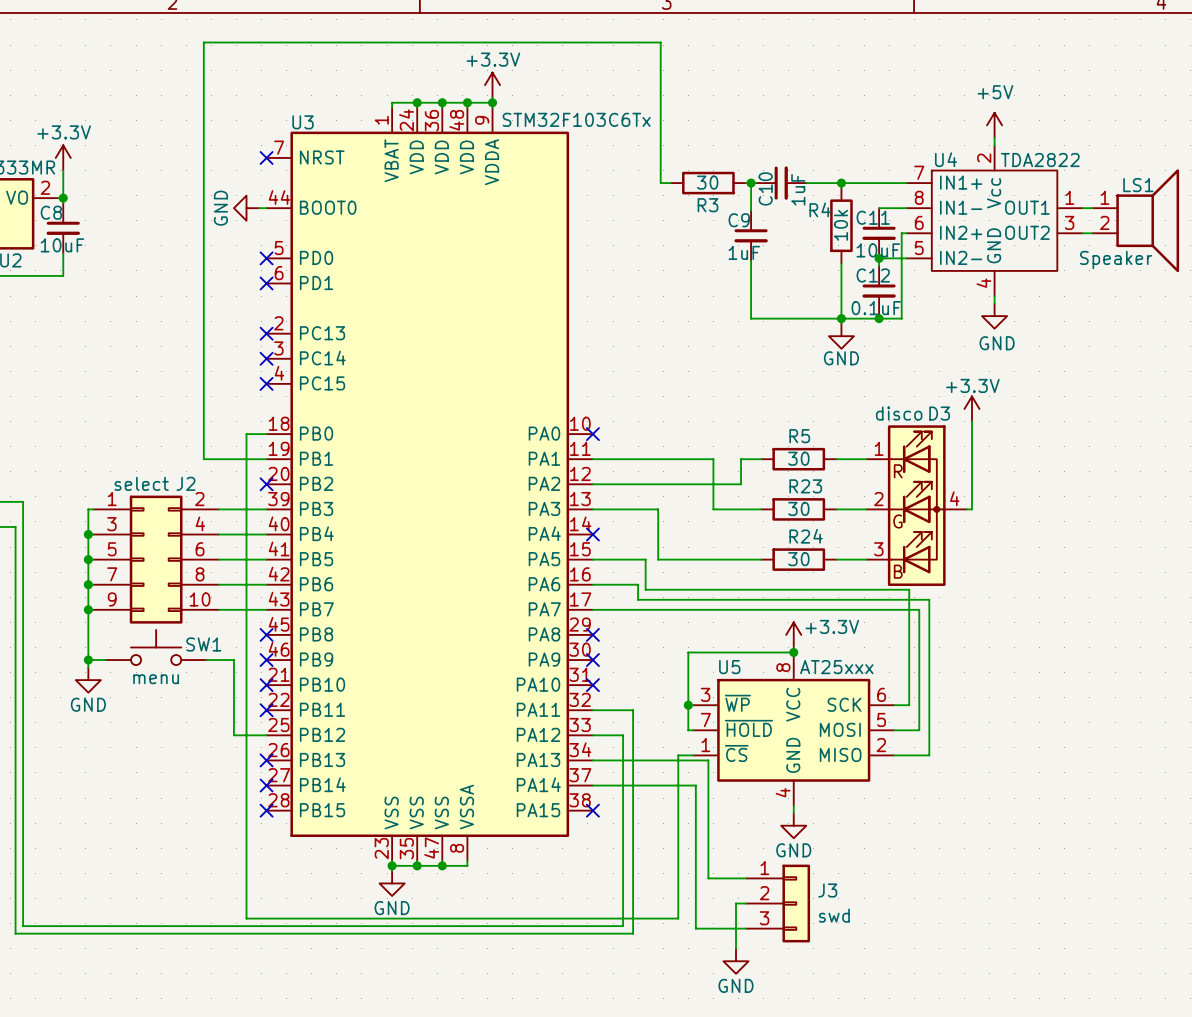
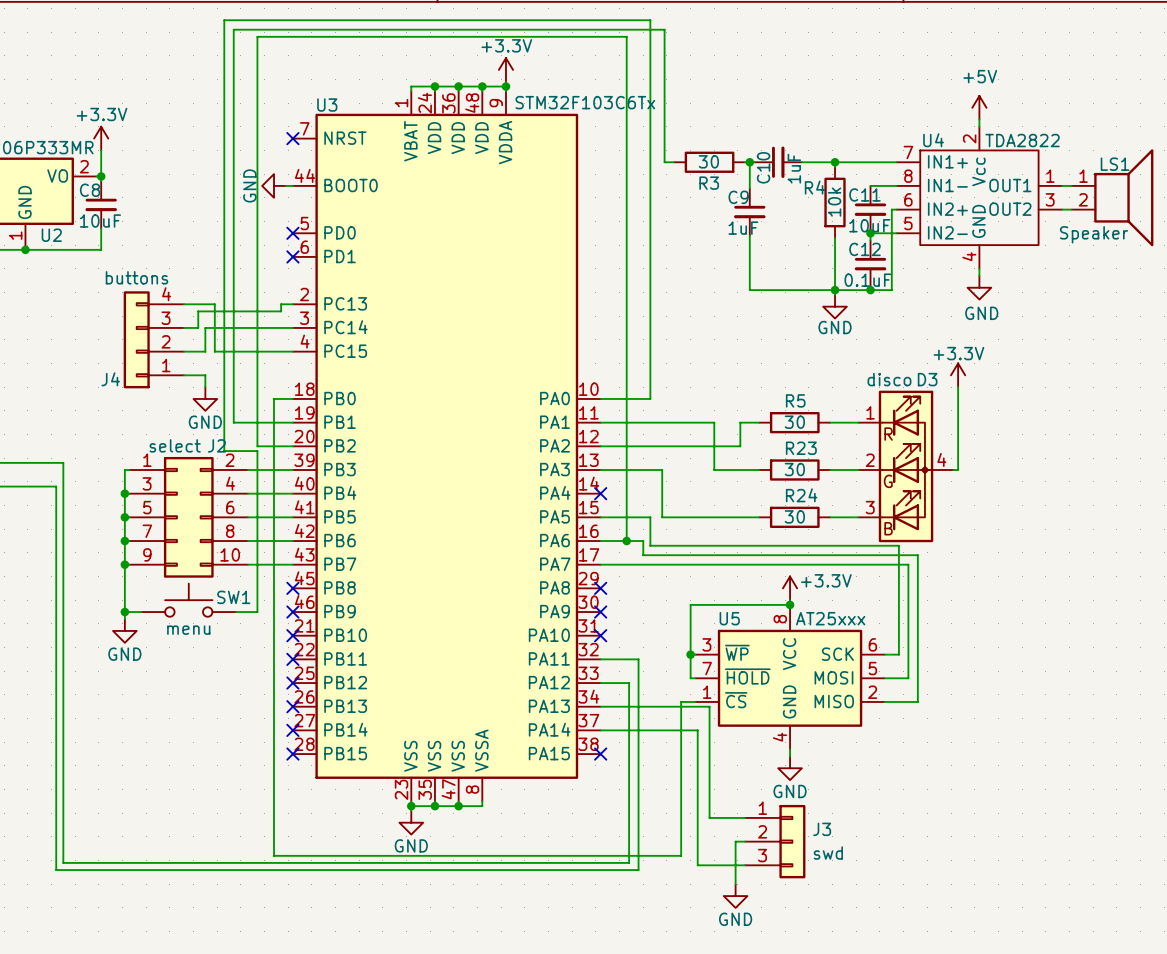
wire: none -> (184, 304) (214, 304) (214, 351) (292, 351)
wire: none -> (292, 304) (281, 304) (281, 311) (198, 311) (198, 327) (184, 327)
no-connect mark: (266, 333) -> none
wire: none -> (292, 327) (205, 327) (205, 351) (184, 351)
no-connect mark: (266, 358) -> none
J4: none -> buttons (153, 339)
no-connect mark: (266, 383) -> none
wire: none -> (184, 375) (205, 375) (205, 387)
power symbol: none -> GND (205, 398)
no-connect mark: (592, 434) -> none
wire: none -> (292, 446) (257, 446) (257, 36) (626, 36) (626, 541)
no-connect mark: (266, 484) -> none
junction: none -> (626, 541)
wire: (228, 660) (233, 660) (233, 735) (266, 735) -> (257, 612) (257, 451) (224, 451) (224, 20) (650, 20) (650, 398) (600, 398)
no-connect mark: none -> (292, 683)

